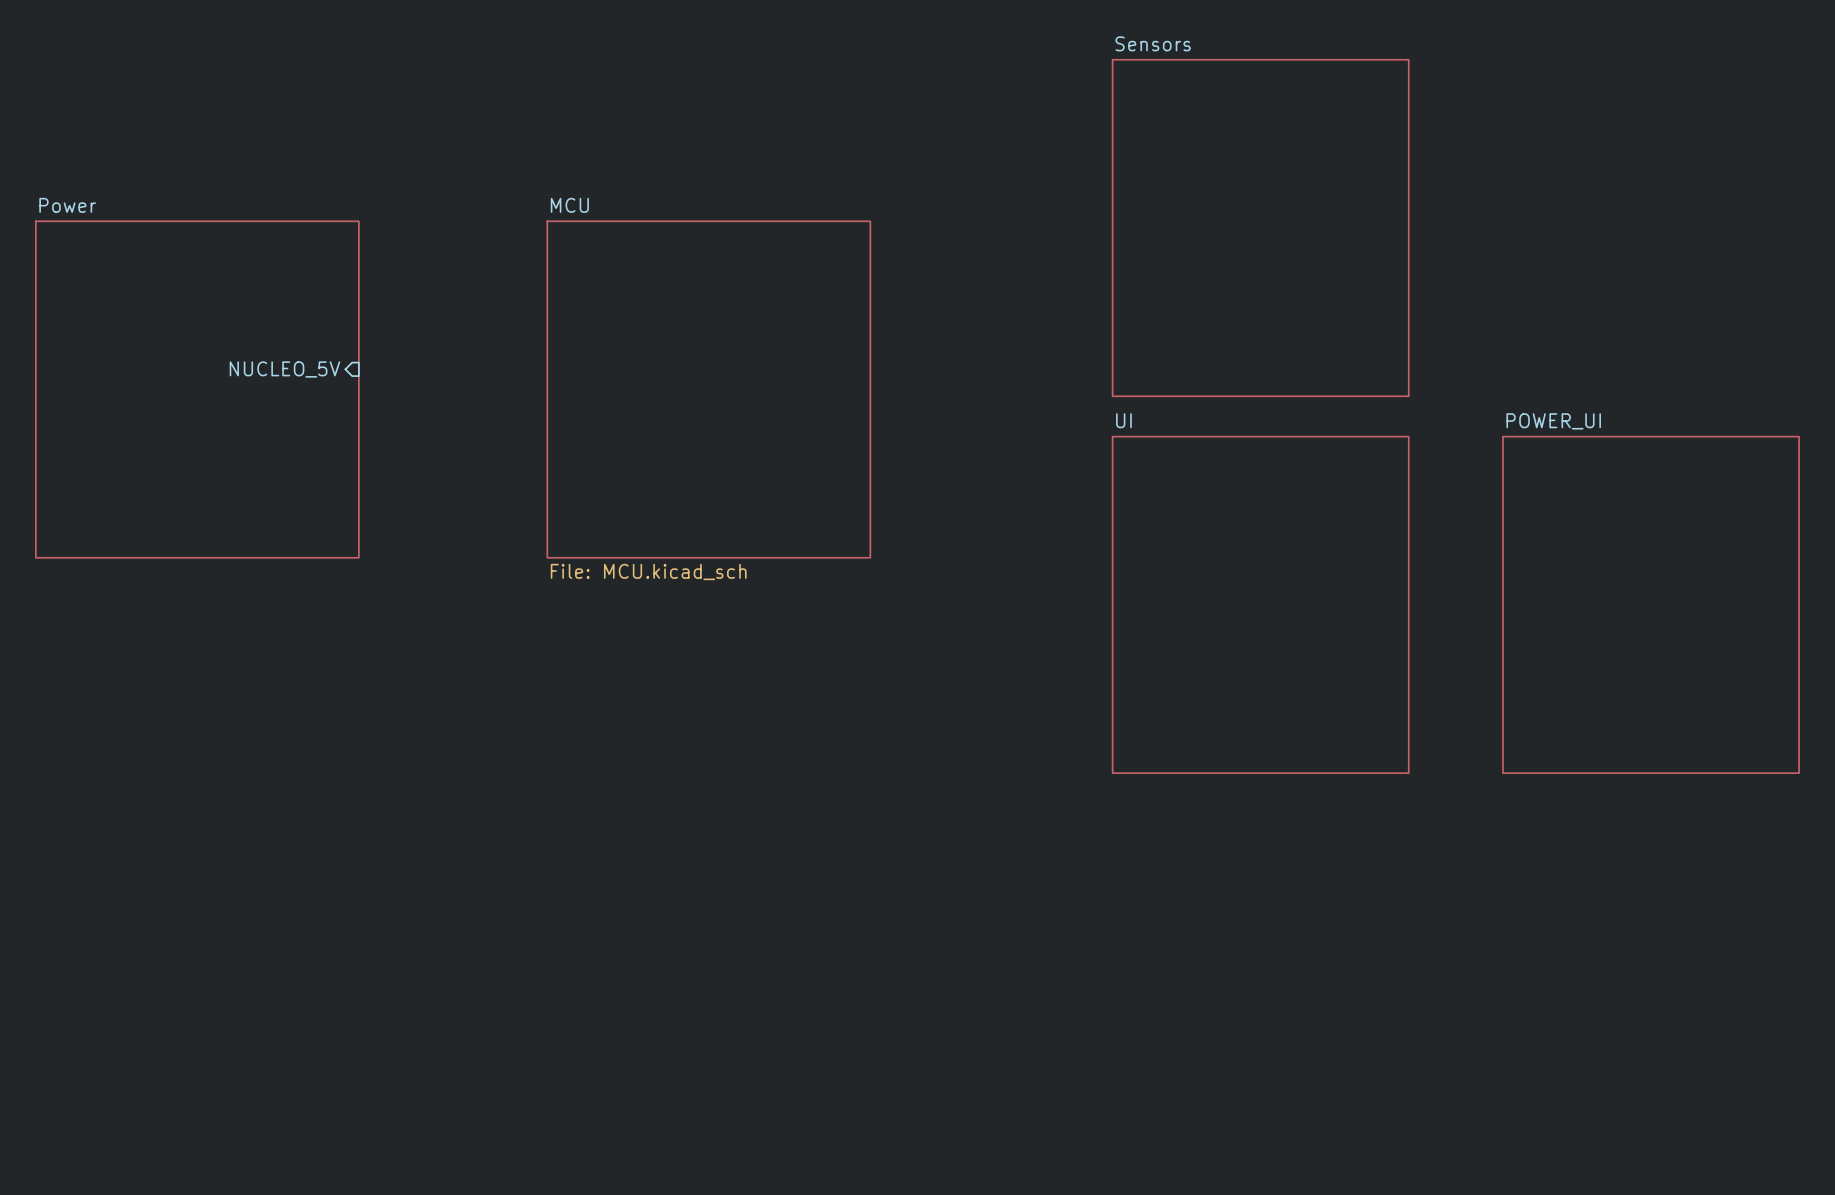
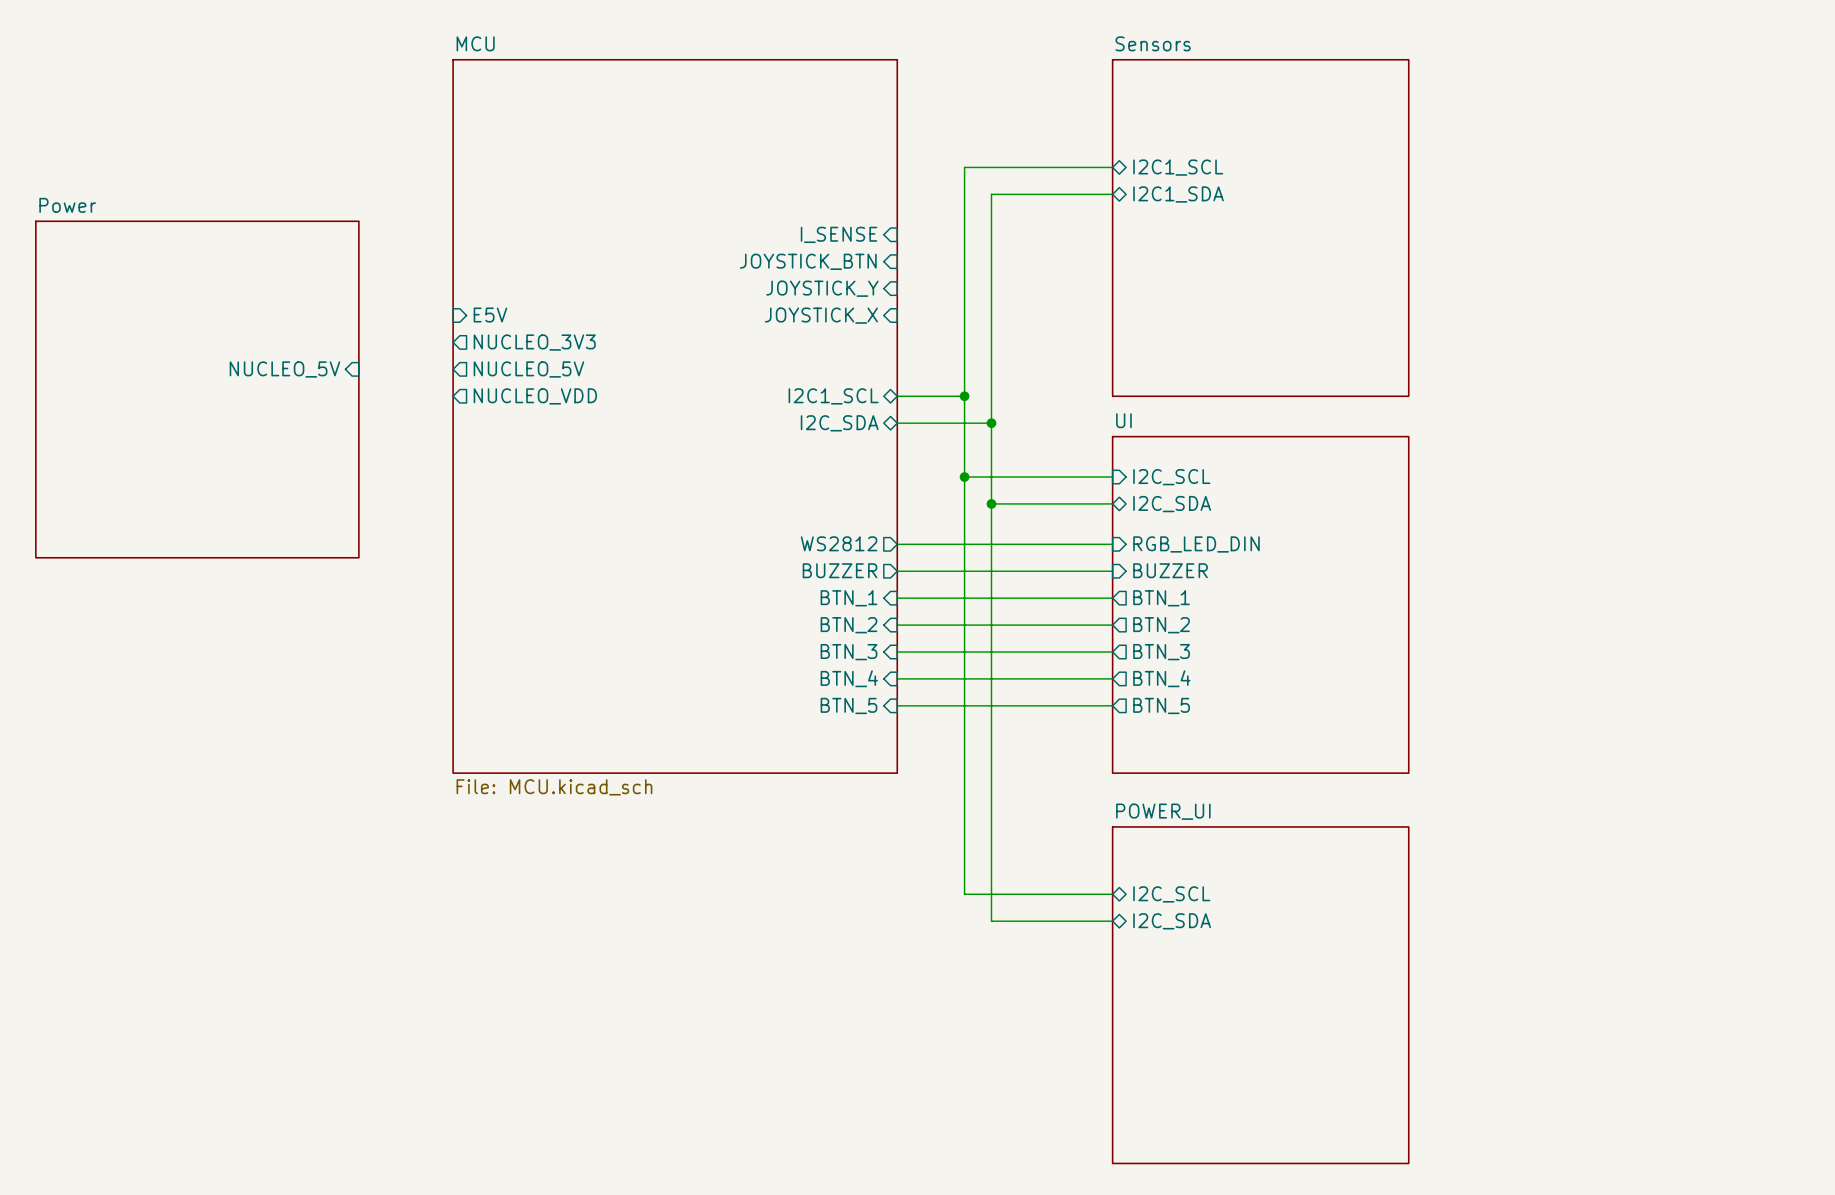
wire: none -> (1112, 167) (964, 167) (964, 894) (1112, 894)
sheet pin: none -> I2C1_SCL (1178, 167)
wire: none -> (1112, 194) (991, 194) (991, 921) (1112, 921)
sheet pin: none -> I2C1_SDA (1178, 194)
sheet pin: none -> I_SENSE (839, 234)
sheet pin: none -> JOYSTICK_BTN (808, 261)
sheet pin: none -> JOYSTICK_Y (822, 288)
sheet pin: none -> E5V (490, 315)
sheet pin: none -> JOYSTICK_X (821, 315)
sheet pin: none -> NUCLEO_3V3 (534, 342)
sheet pin: none -> NUCLEO_5V (528, 369)
sheet MCU: File: MCU.kicad_sch (708, 389) -> none
sheet pin: none -> NUCLEO_VDD (535, 396)
sheet pin: none -> I2C1_SCL (833, 396)
wire: none -> (897, 396) (964, 396)
junction: none -> (964, 396)
sheet MCU: none -> File: MCU.kicad_sch (675, 416)
sheet pin: none -> I2C_SDA (839, 423)
wire: none -> (897, 423) (991, 423)
junction: none -> (991, 423)
wire: none -> (964, 477) (1112, 477)
junction: none -> (964, 477)
sheet pin: none -> I2C_SCL (1171, 477)
wire: none -> (991, 503) (1112, 503)
junction: none -> (991, 503)
sheet pin: none -> I2C_SDA (1172, 504)
sheet pin: none -> WS2812 (839, 543)
wire: none -> (897, 544) (1112, 544)
sheet pin: none -> RGB_LED_DIN (1196, 544)
sheet pin: none -> BUZZER (840, 570)
sheet pin: none -> BUZZER (1170, 570)
wire: none -> (897, 571) (1112, 571)
sheet pin: none -> BTN_1 (848, 598)
wire: none -> (897, 598) (1112, 598)
sheet pin: none -> BTN_1 (1161, 598)
sheet POWER_UI: (1651, 604) -> none
sheet pin: none -> BTN_2 (848, 625)
wire: none -> (897, 625) (1112, 625)
sheet pin: none -> BTN_2 (1161, 625)
sheet pin: none -> BTN_3 (848, 652)
wire: none -> (897, 652) (1112, 652)
sheet pin: none -> BTN_3 (1161, 652)
sheet pin: none -> BTN_4 (849, 678)
wire: none -> (897, 678) (1112, 678)
sheet pin: none -> BTN_4 (1161, 678)
sheet pin: none -> BTN_5 (848, 705)
wire: none -> (897, 705) (1112, 705)
sheet pin: none -> BTN_5 (1161, 705)
sheet pin: none -> I2C_SCL (1171, 894)
sheet pin: none -> I2C_SDA (1172, 921)
sheet POWER_UI: none -> (1260, 995)

